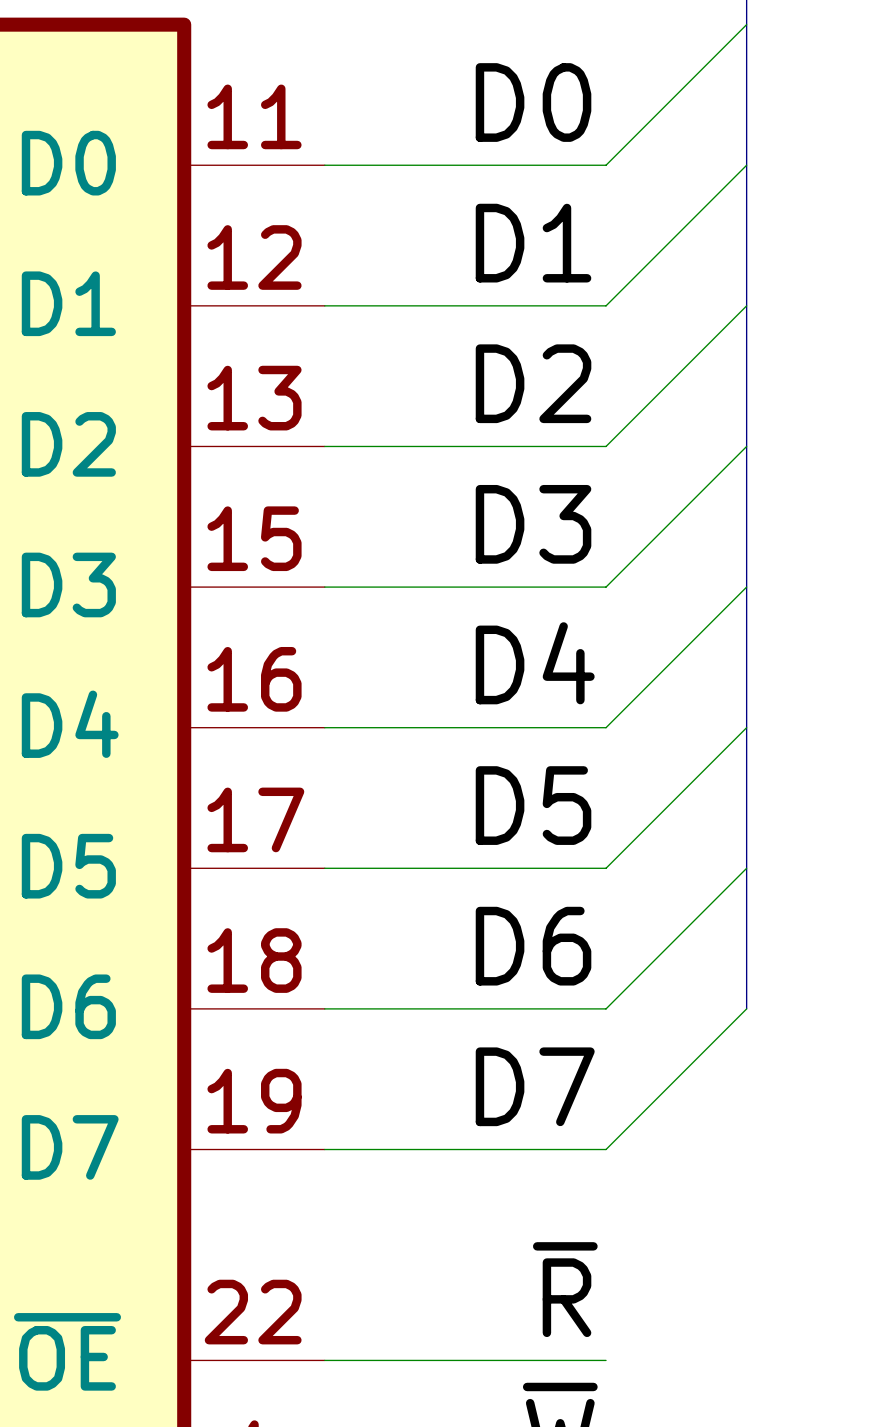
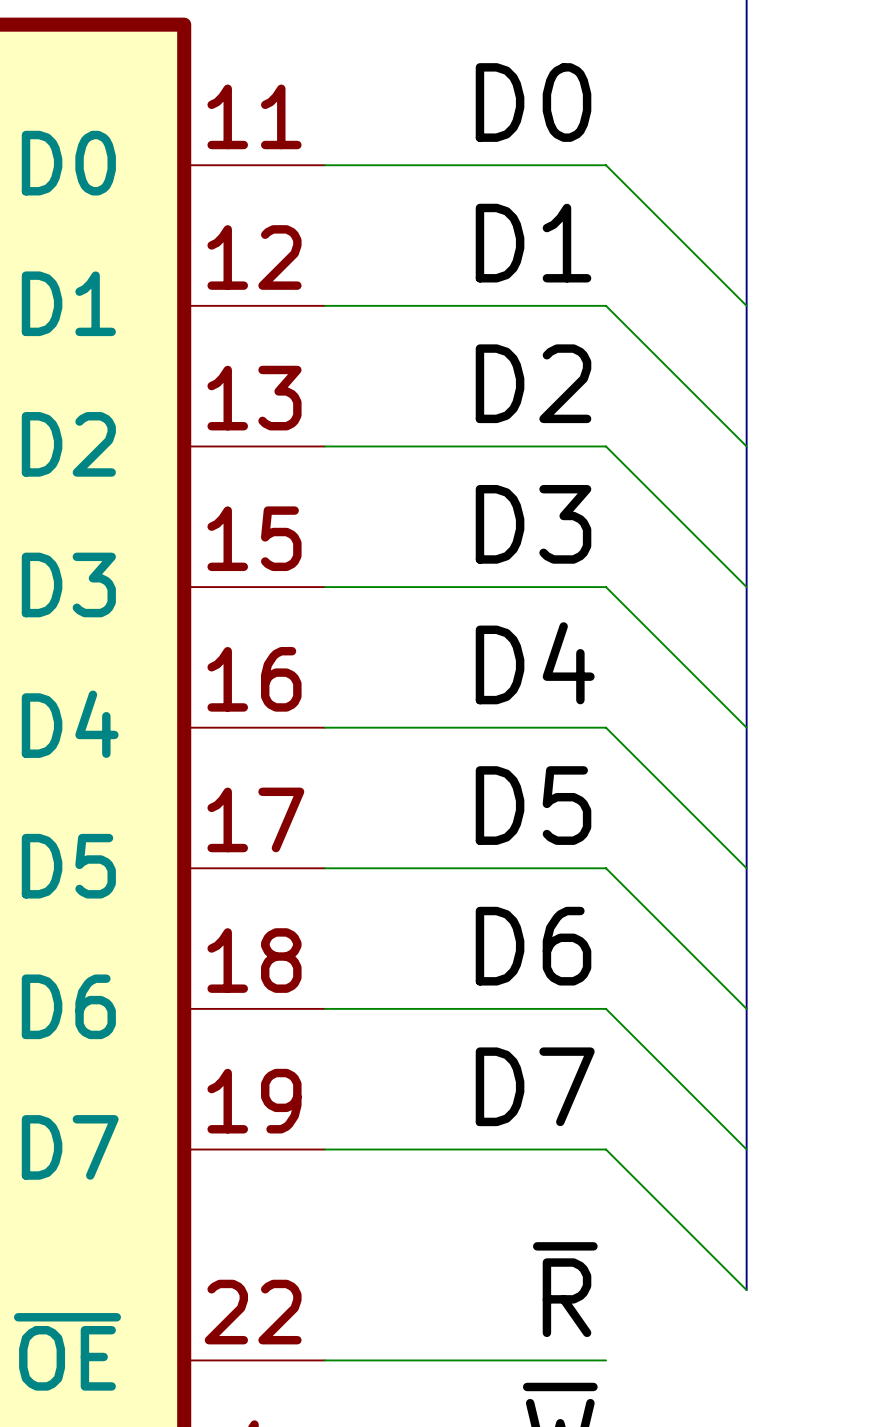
wire: (746, 24) (606, 165) -> (746, 305) (606, 165)
wire: (746, 165) (606, 305) -> (746, 446) (606, 305)
wire: (746, 305) (606, 446) -> (746, 587) (606, 446)
wire: (746, 446) (606, 587) -> (746, 727) (606, 587)
wire: (746, 587) (606, 727) -> (746, 868) (606, 727)
wire: (746, 727) (606, 868) -> (746, 1008) (606, 868)
wire: (746, 868) (606, 1008) -> (746, 1149) (606, 1008)
wire: (746, 1008) (606, 1149) -> (746, 1290) (606, 1149)
bus: none -> (746, 1008) (746, 1290)

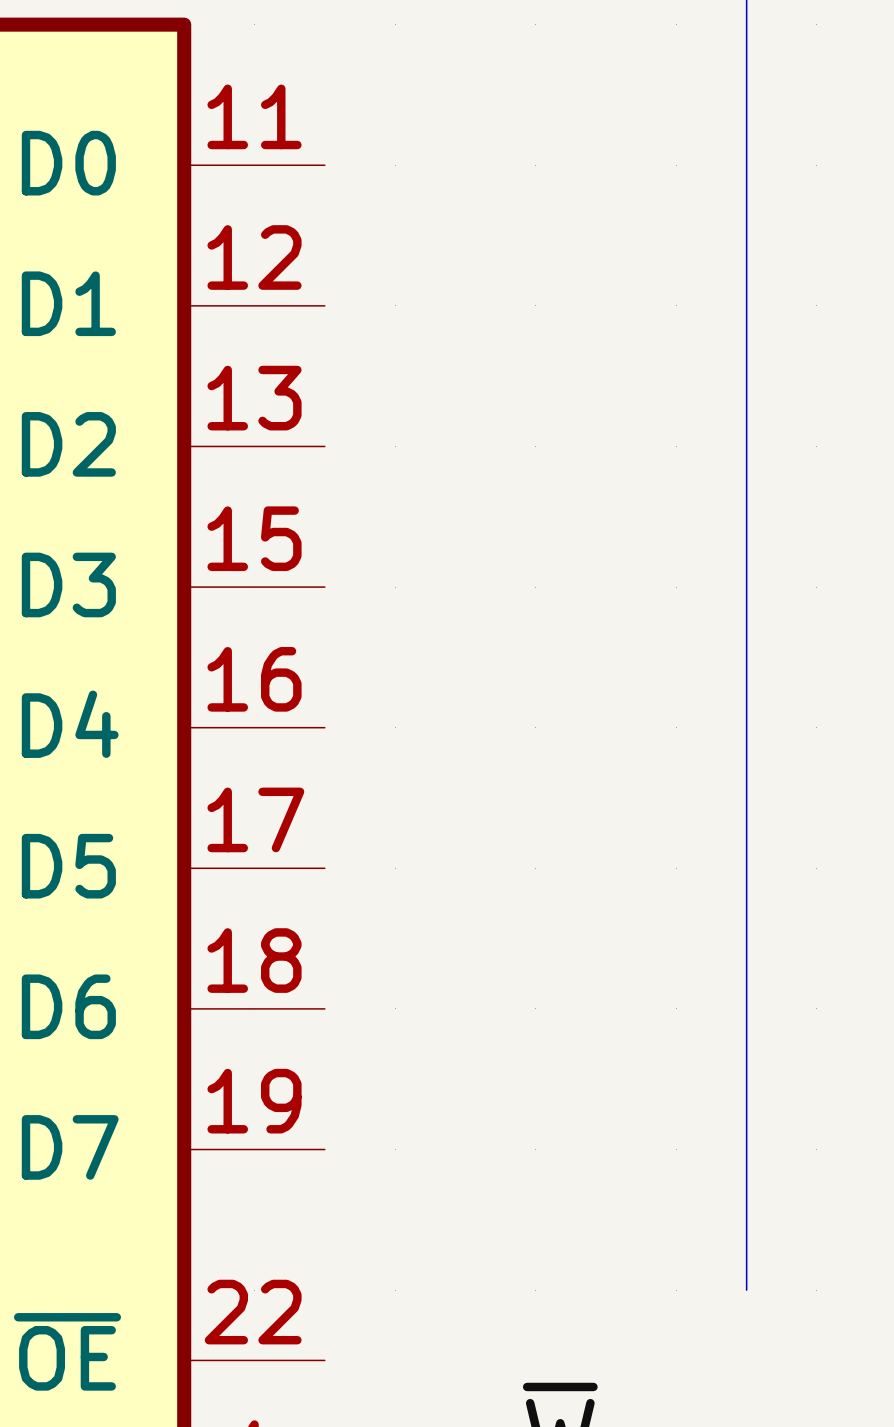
label: D0 (533, 102) -> none
wire: (324, 165) (606, 165) (746, 305) -> none
label: D1 (533, 243) -> none
wire: (324, 305) (606, 305) (746, 446) -> none
label: D2 (533, 383) -> none
wire: (324, 446) (606, 446) (746, 587) -> none
label: D3 (533, 524) -> none
wire: (324, 587) (606, 587) (746, 727) -> none
label: D4 (535, 663) -> none
wire: (324, 727) (606, 727) (746, 868) -> none
label: D5 (533, 805) -> none
wire: (324, 868) (606, 868) (746, 1008) -> none
label: D6 (533, 946) -> none
wire: (324, 1008) (606, 1008) (746, 1149) -> none
label: D7 (535, 1086) -> none
wire: (324, 1149) (606, 1149) (746, 1290) -> none
label: ~{R} (565, 1289) -> none
wire: (324, 1360) (606, 1360) -> none

